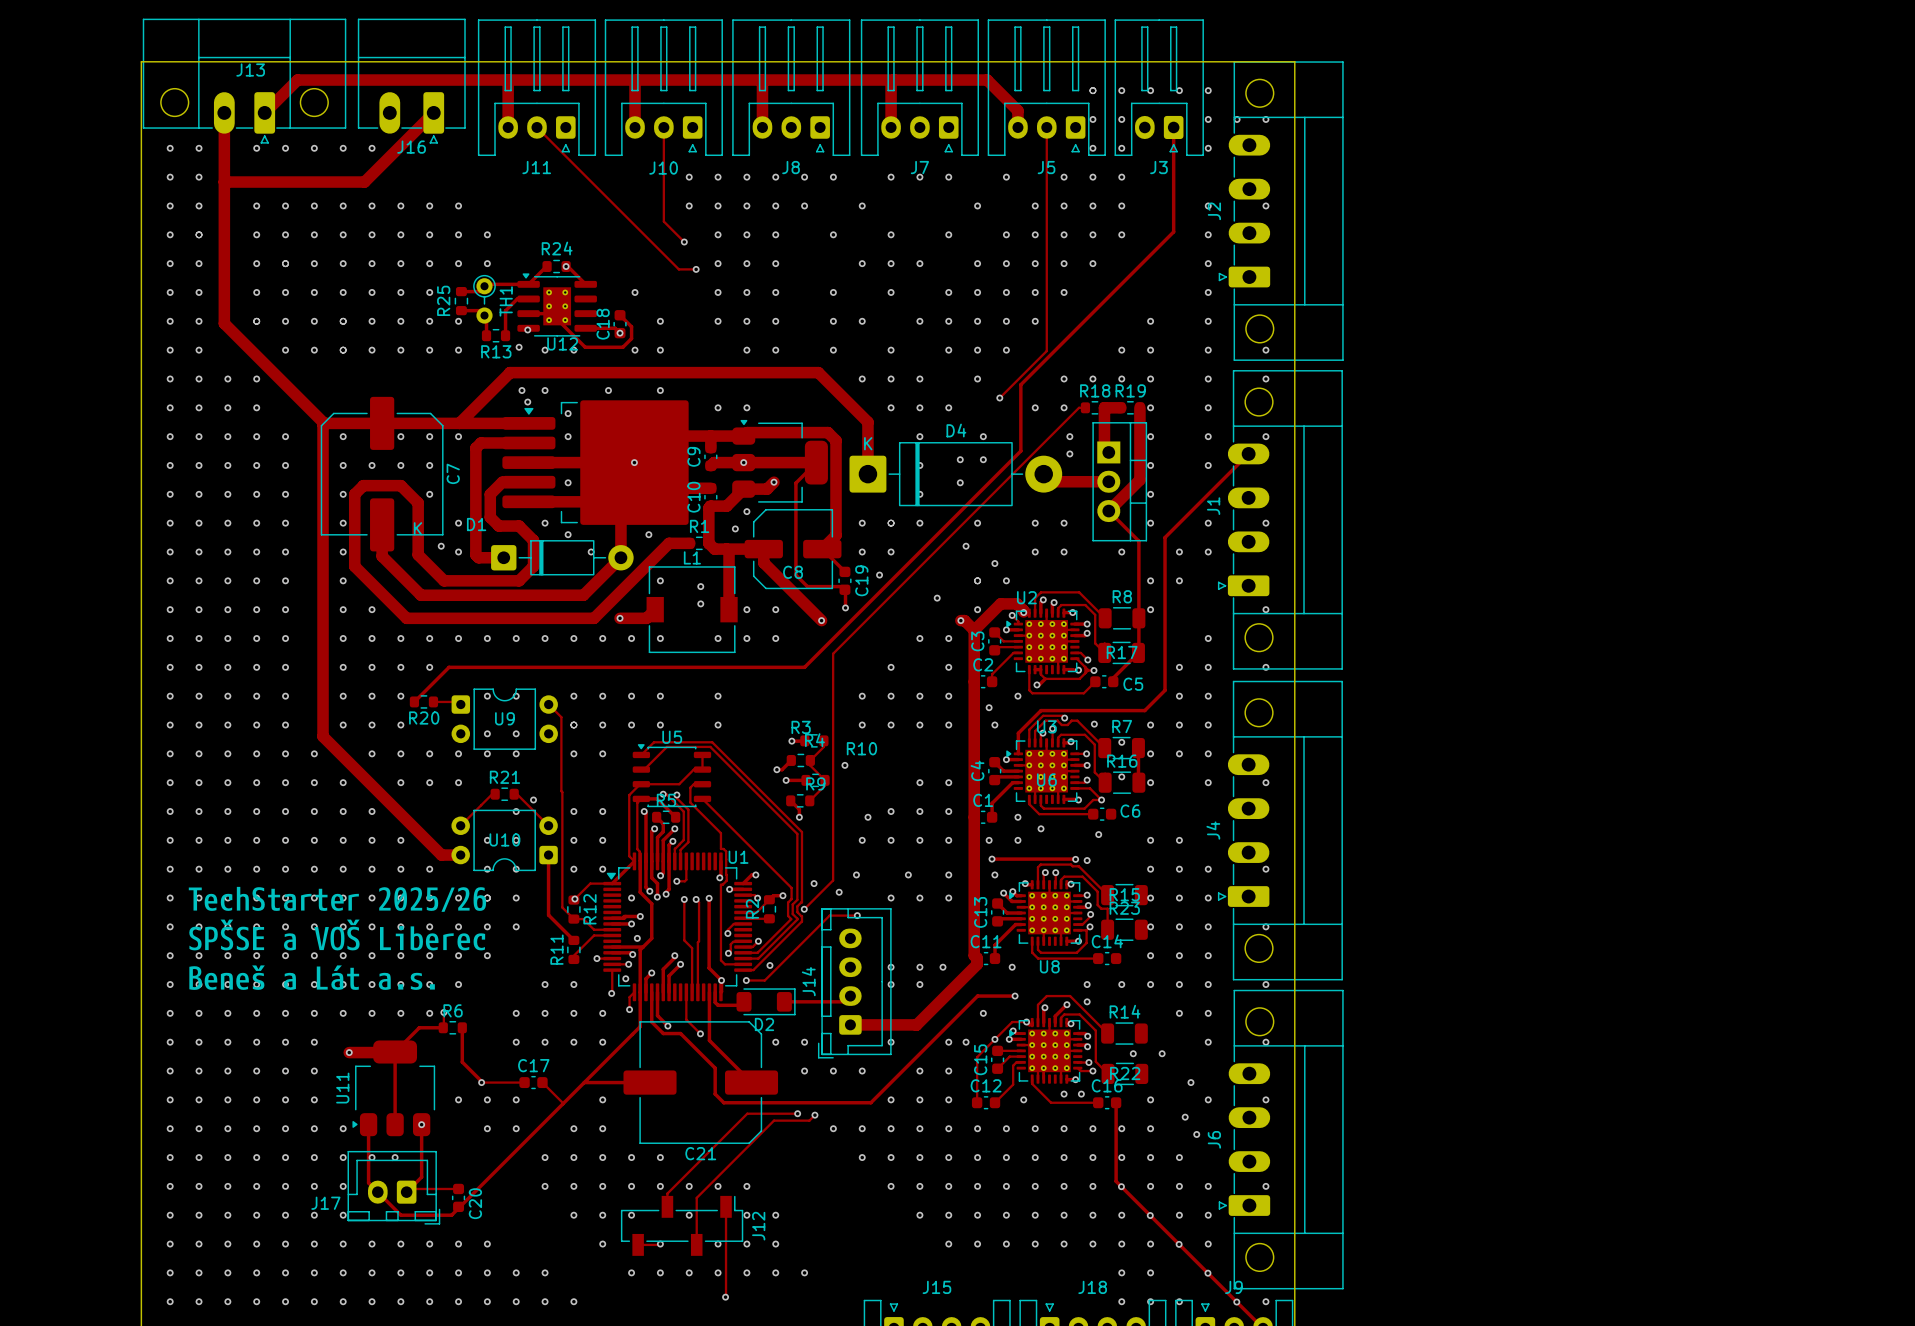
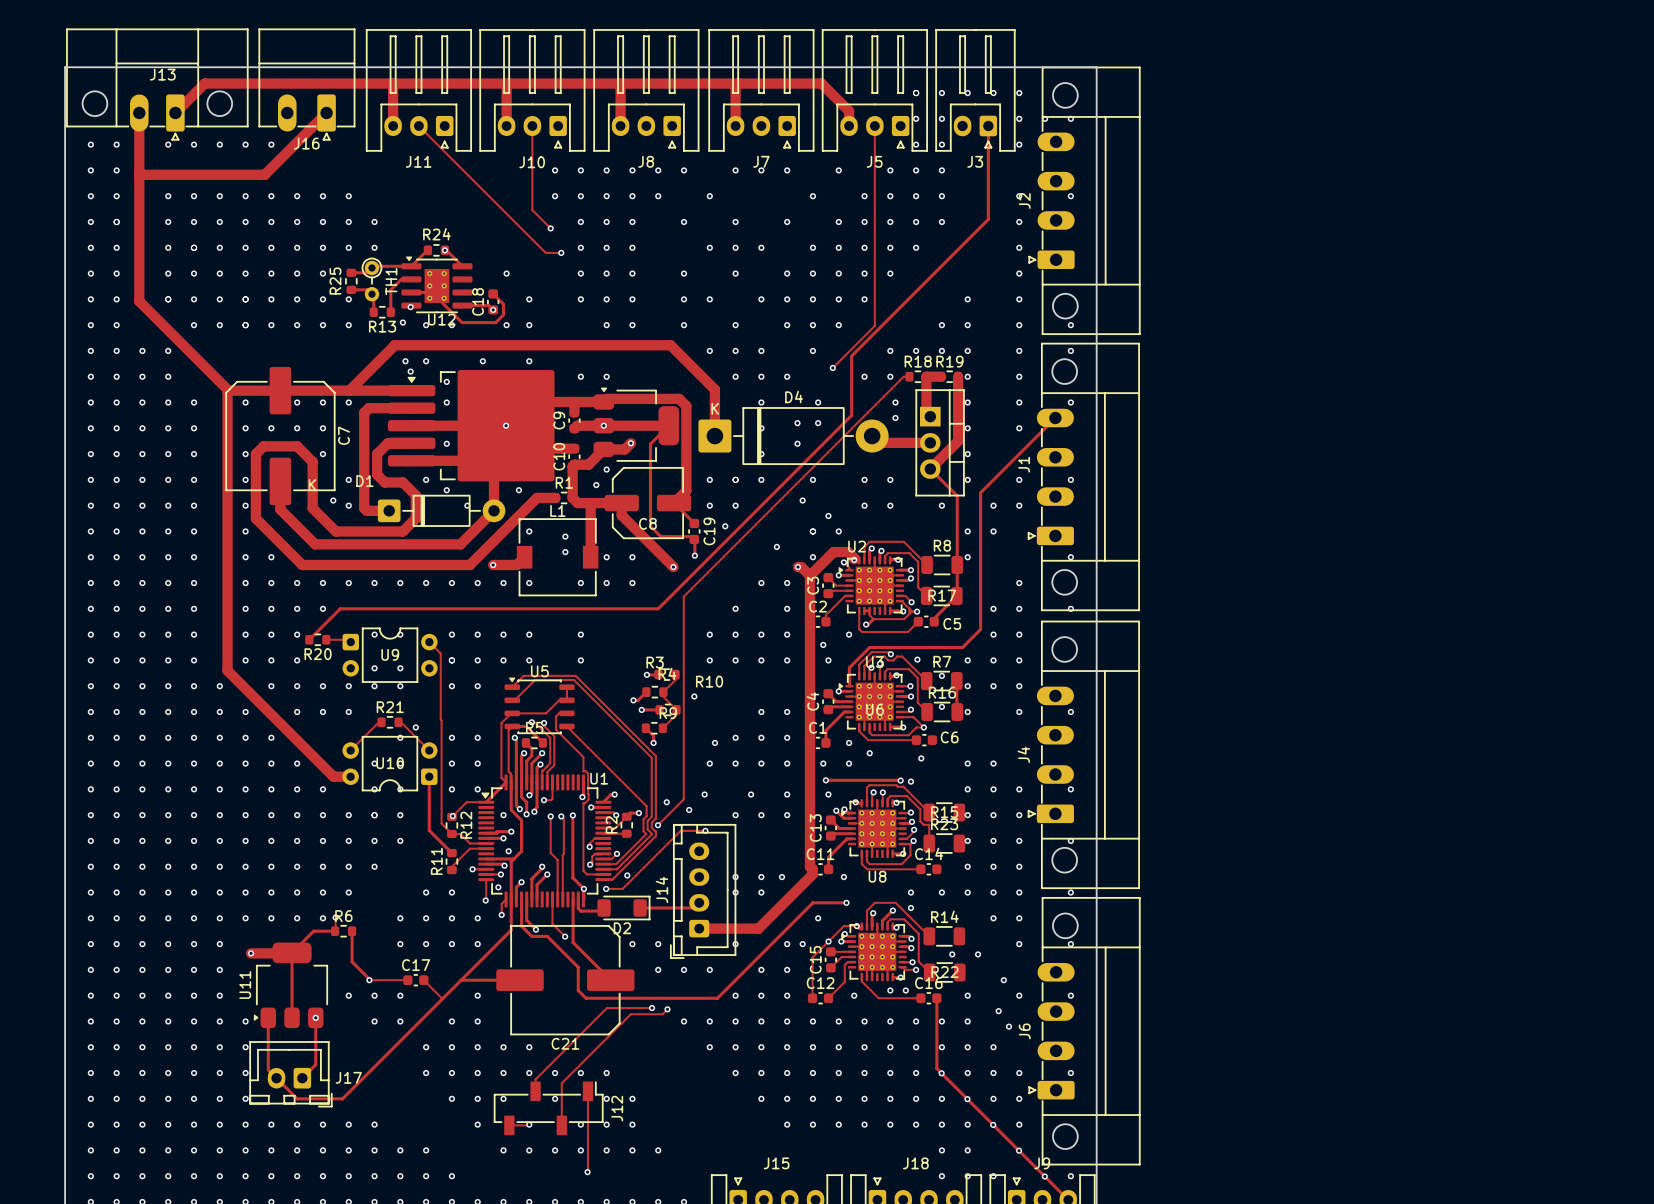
drawing: [188, 886, 487, 990] -> none
via: (372, 1157) -> none
via: (395, 1157) -> none
track: (458, 1188) (409, 1188) (406, 1192) -> none
C20: (458, 1197) -> none
J17 name position: J17 (325, 1203) -> J17 (348, 1077)

